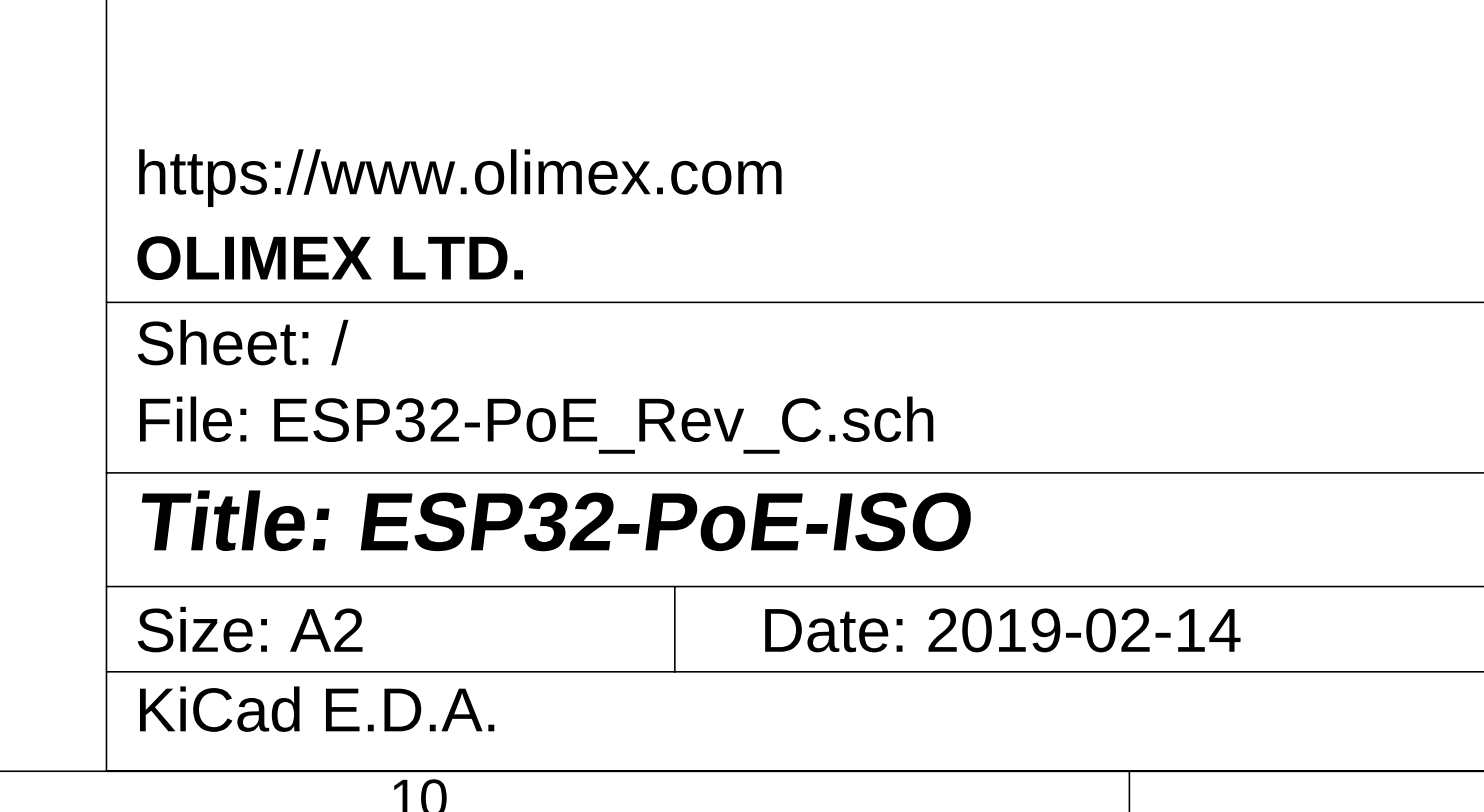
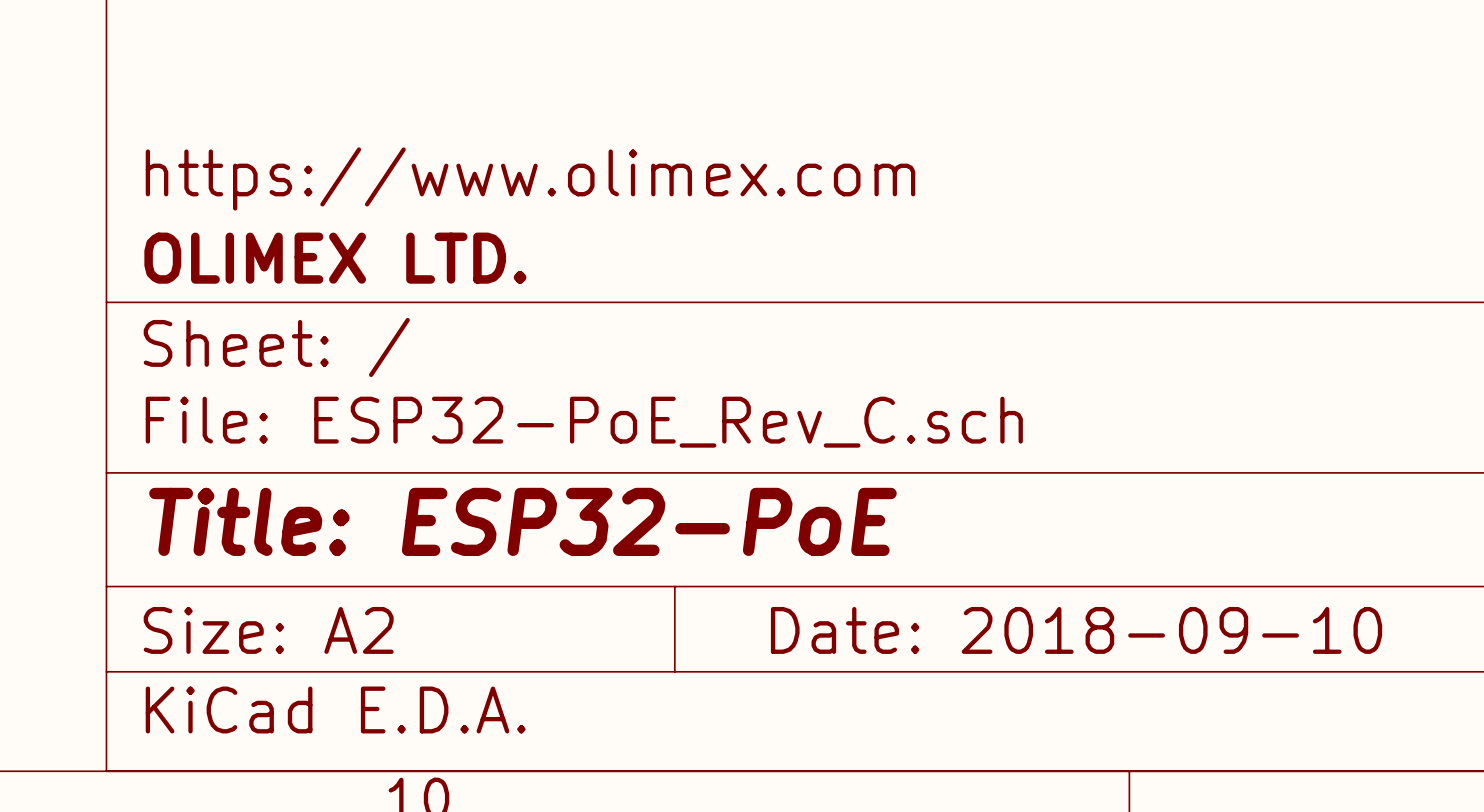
title block: Title: ESP32-PoE-ISO (556, 520) -> Title: ESP32-PoE (522, 521)
title block: Date: 2019-02-14 (1002, 630) -> Date: 2018-09-10 (1076, 630)

